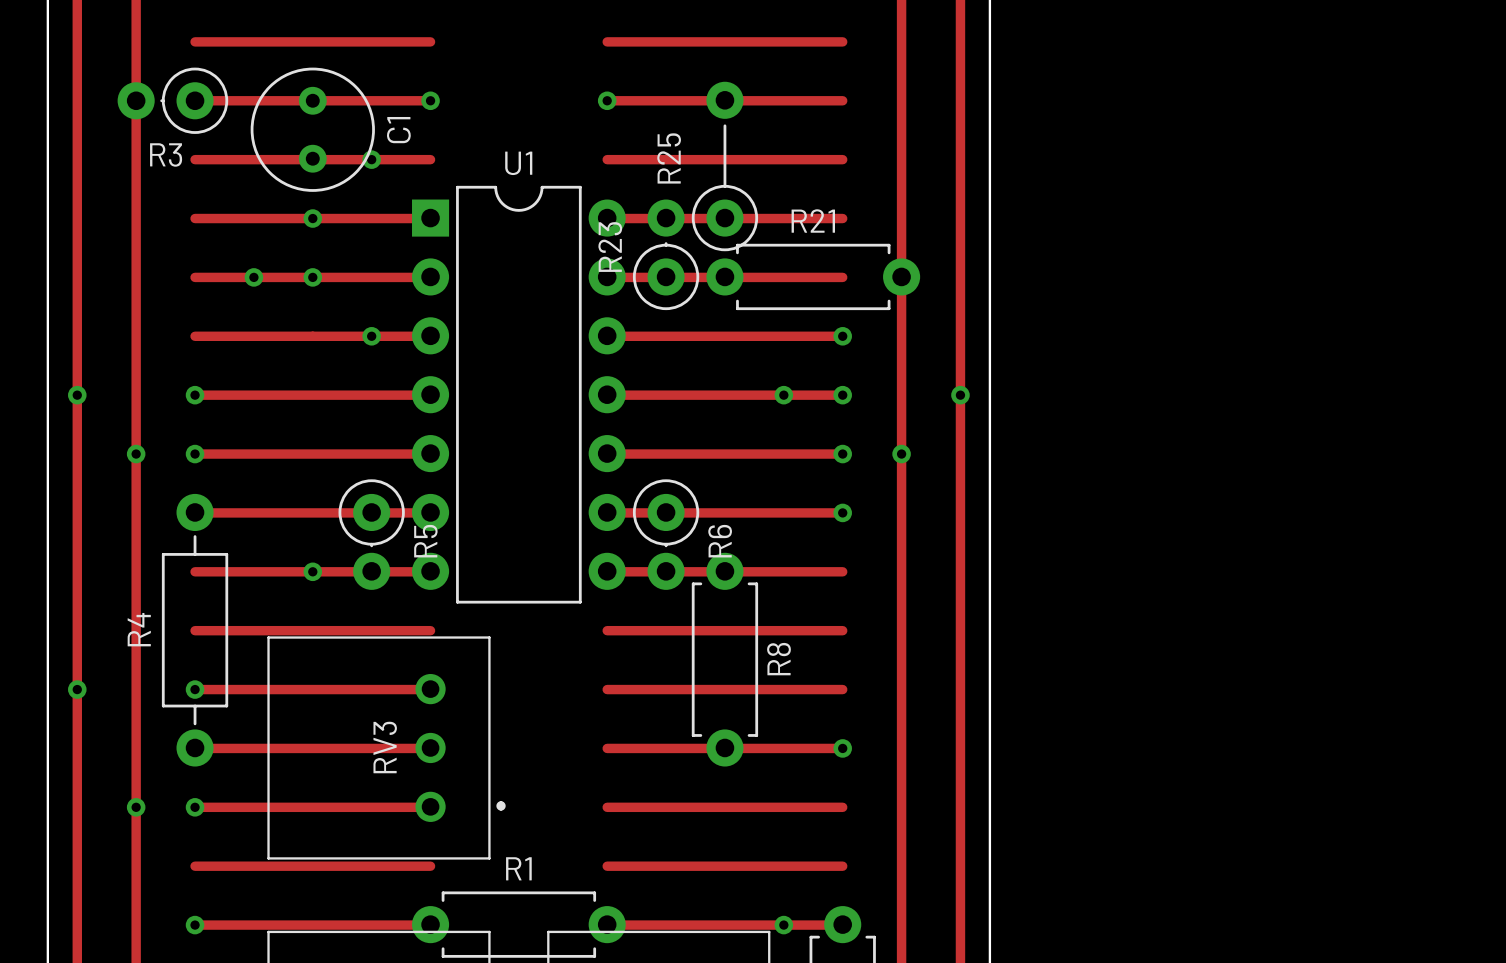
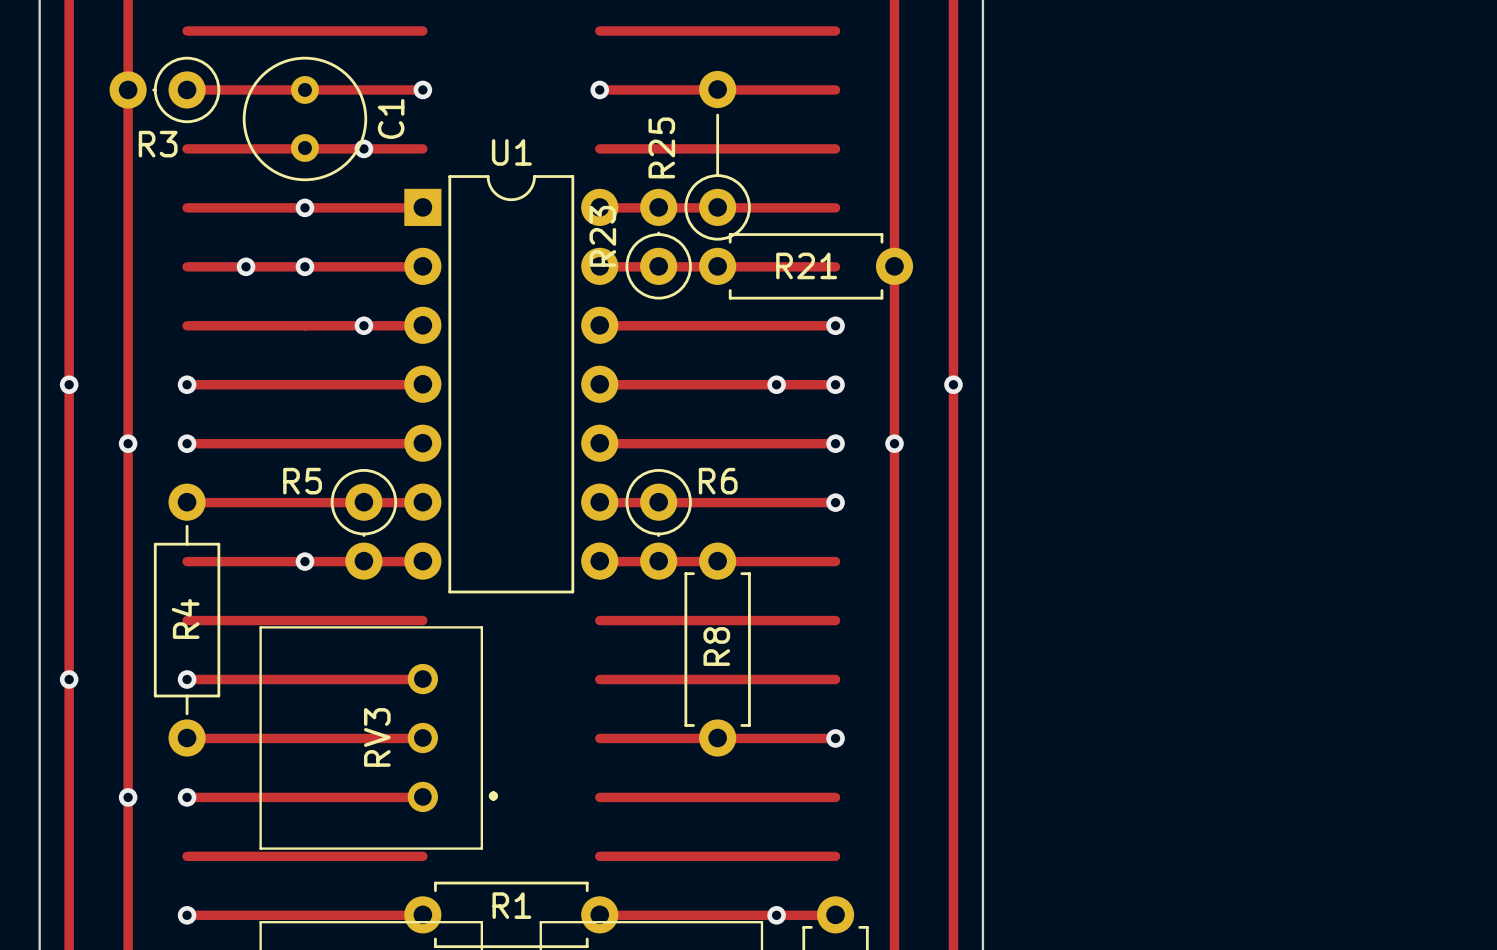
R21 name position: R21 (813, 221) -> R21 (806, 265)
R5 name rotation: 0° (425, 541) -> 90° clockwise (302, 481)
R5 name position: R5 (425, 541) -> R5 (302, 481)
R6 name rotation: 0° (720, 541) -> 90° clockwise (718, 481)
R4 name position: R4 (139, 629) -> R4 (185, 618)
R8 name position: R8 (778, 659) -> R8 (716, 646)
R1 name position: R1 (518, 868) -> R1 (511, 905)

